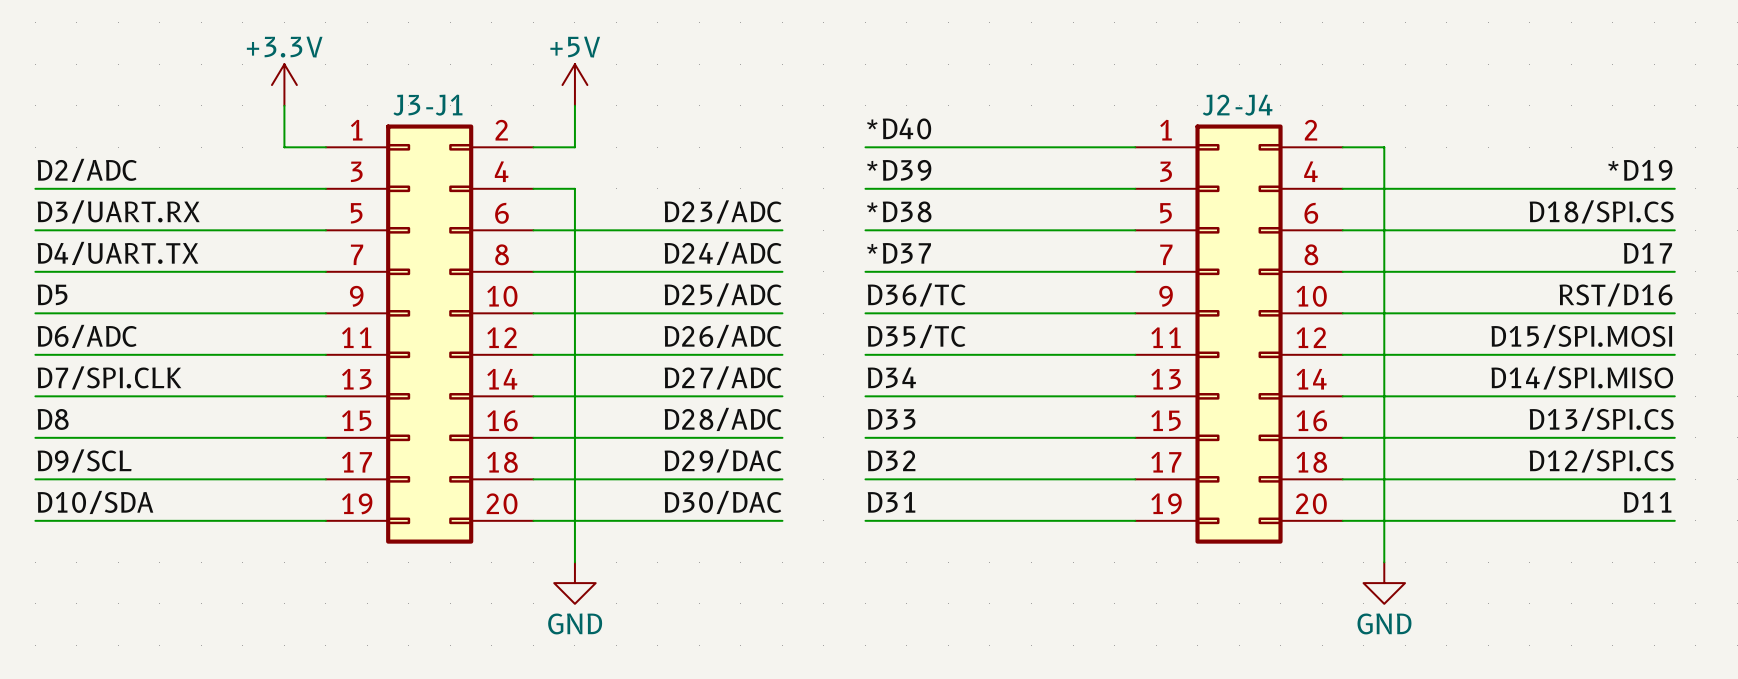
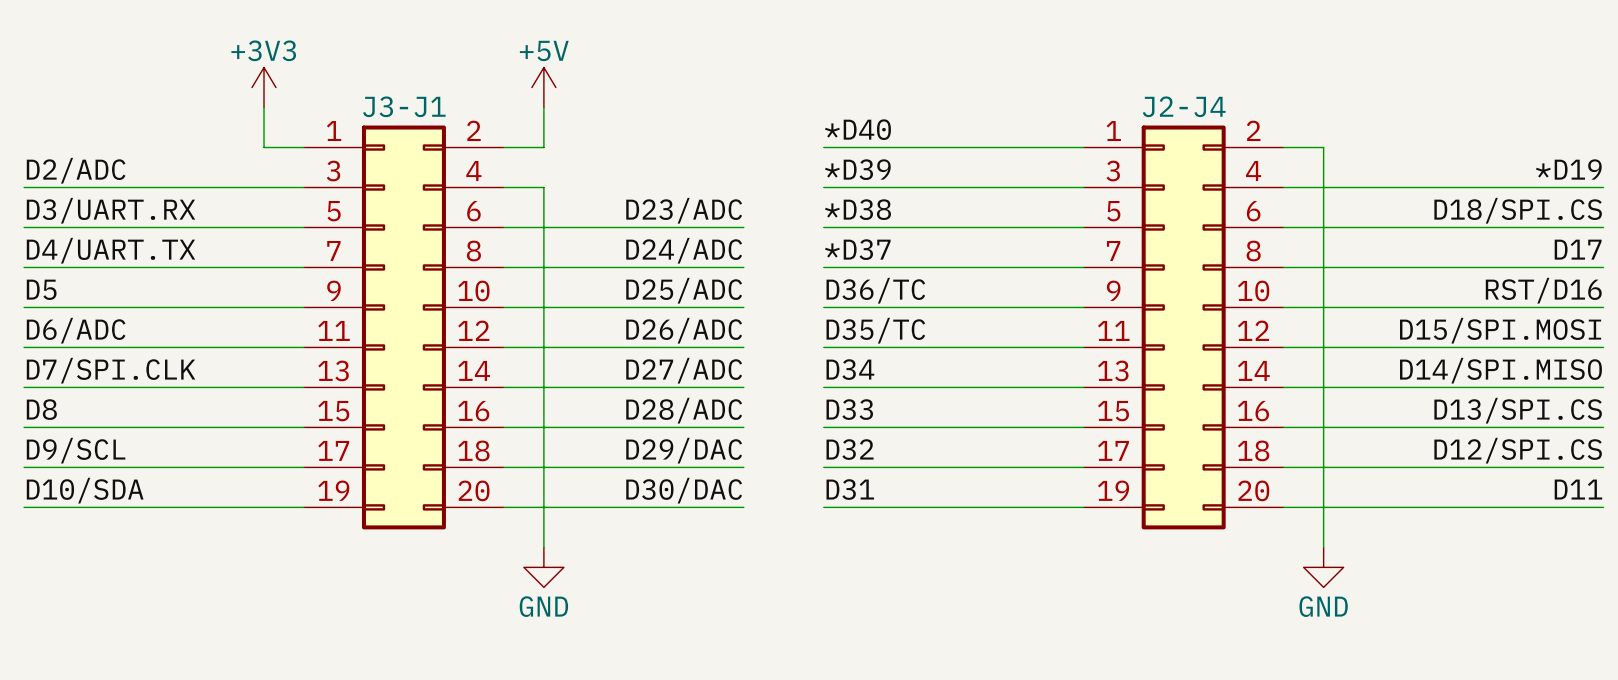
power symbol: +3.3V (284, 85) -> +3V3 (264, 87)

